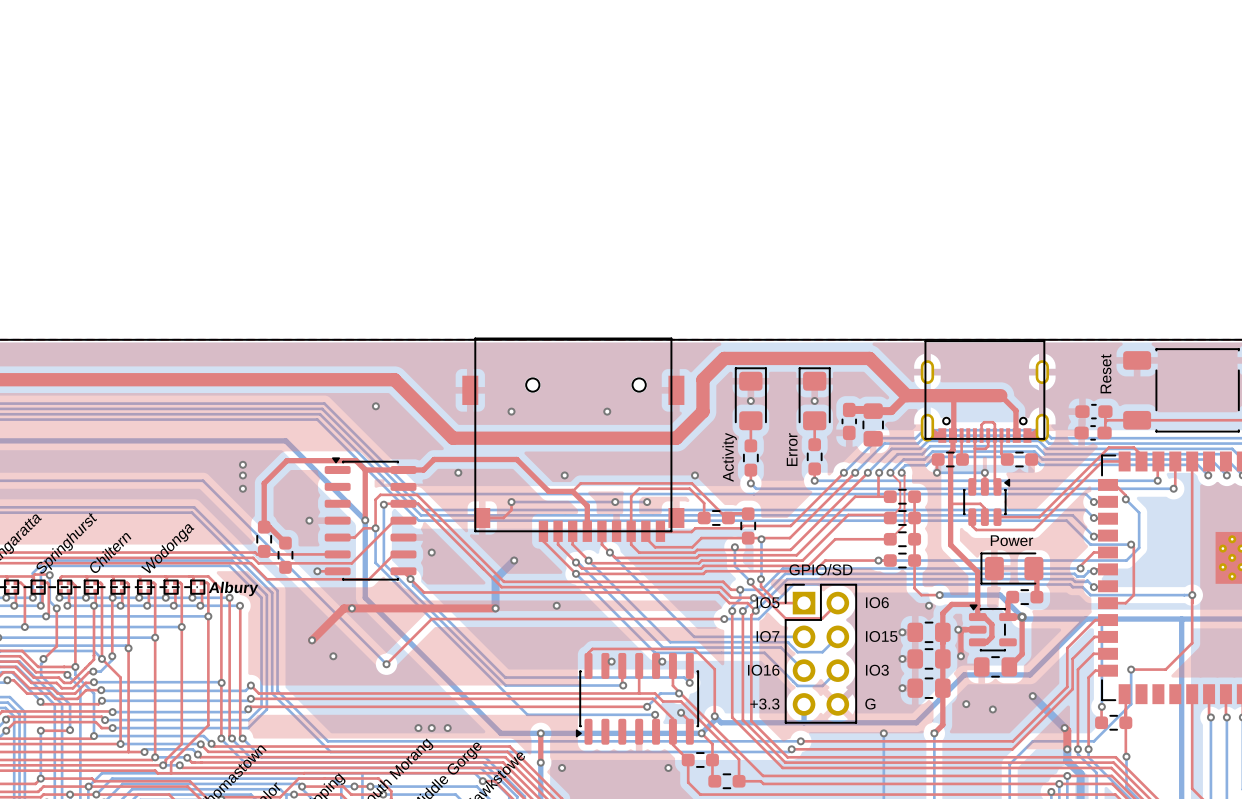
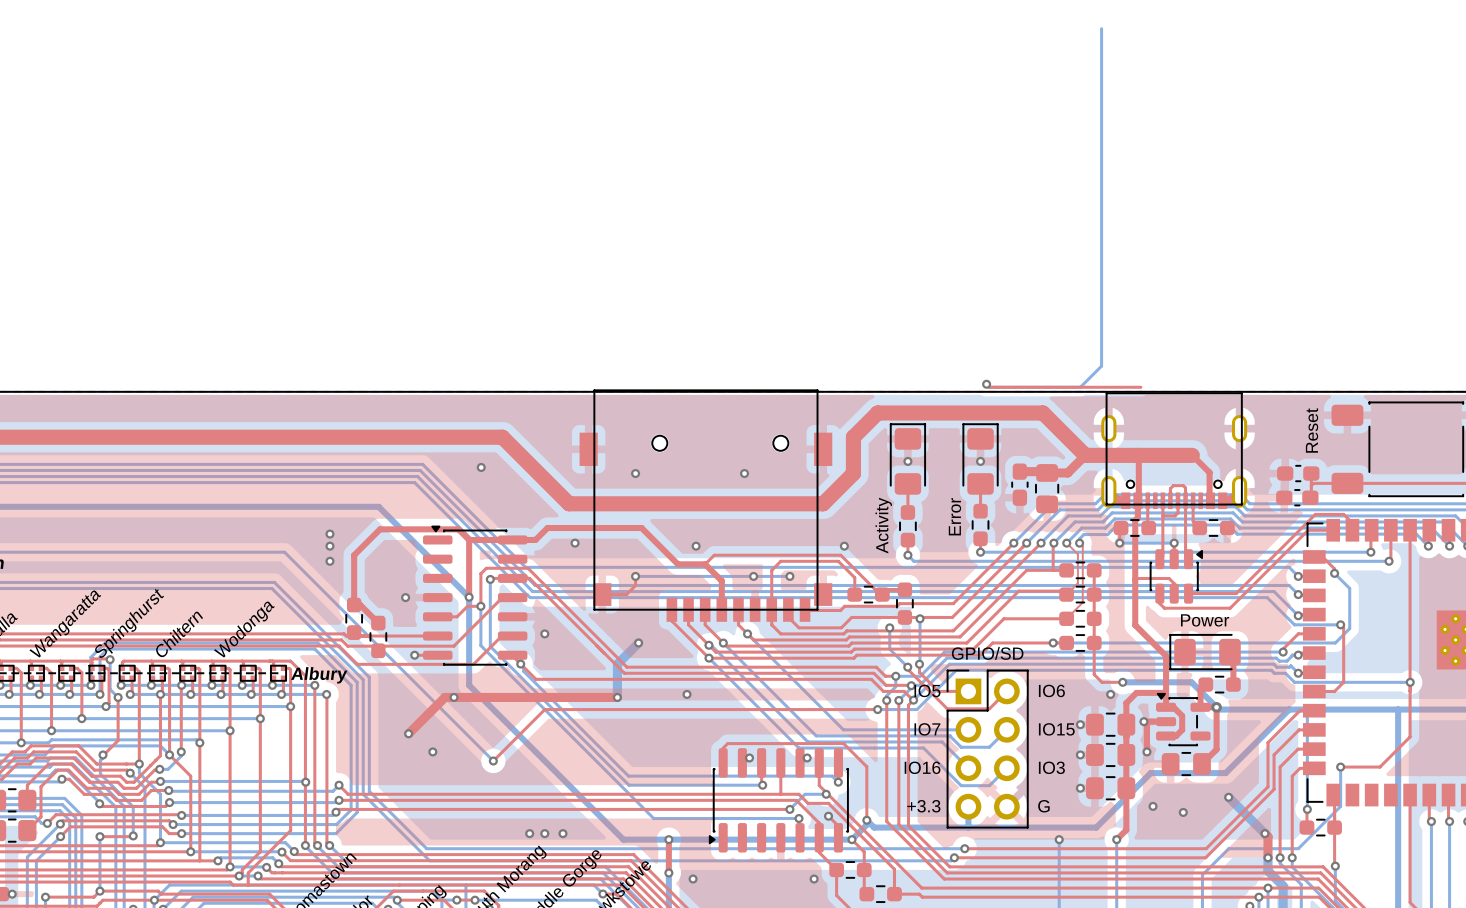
bottom track: none -> (1101, 28) (1101, 366) (1080, 387) (989, 387) (986, 384)
top track: none -> (986, 384) (989, 387) (1140, 387)
via: none -> (986, 384)

